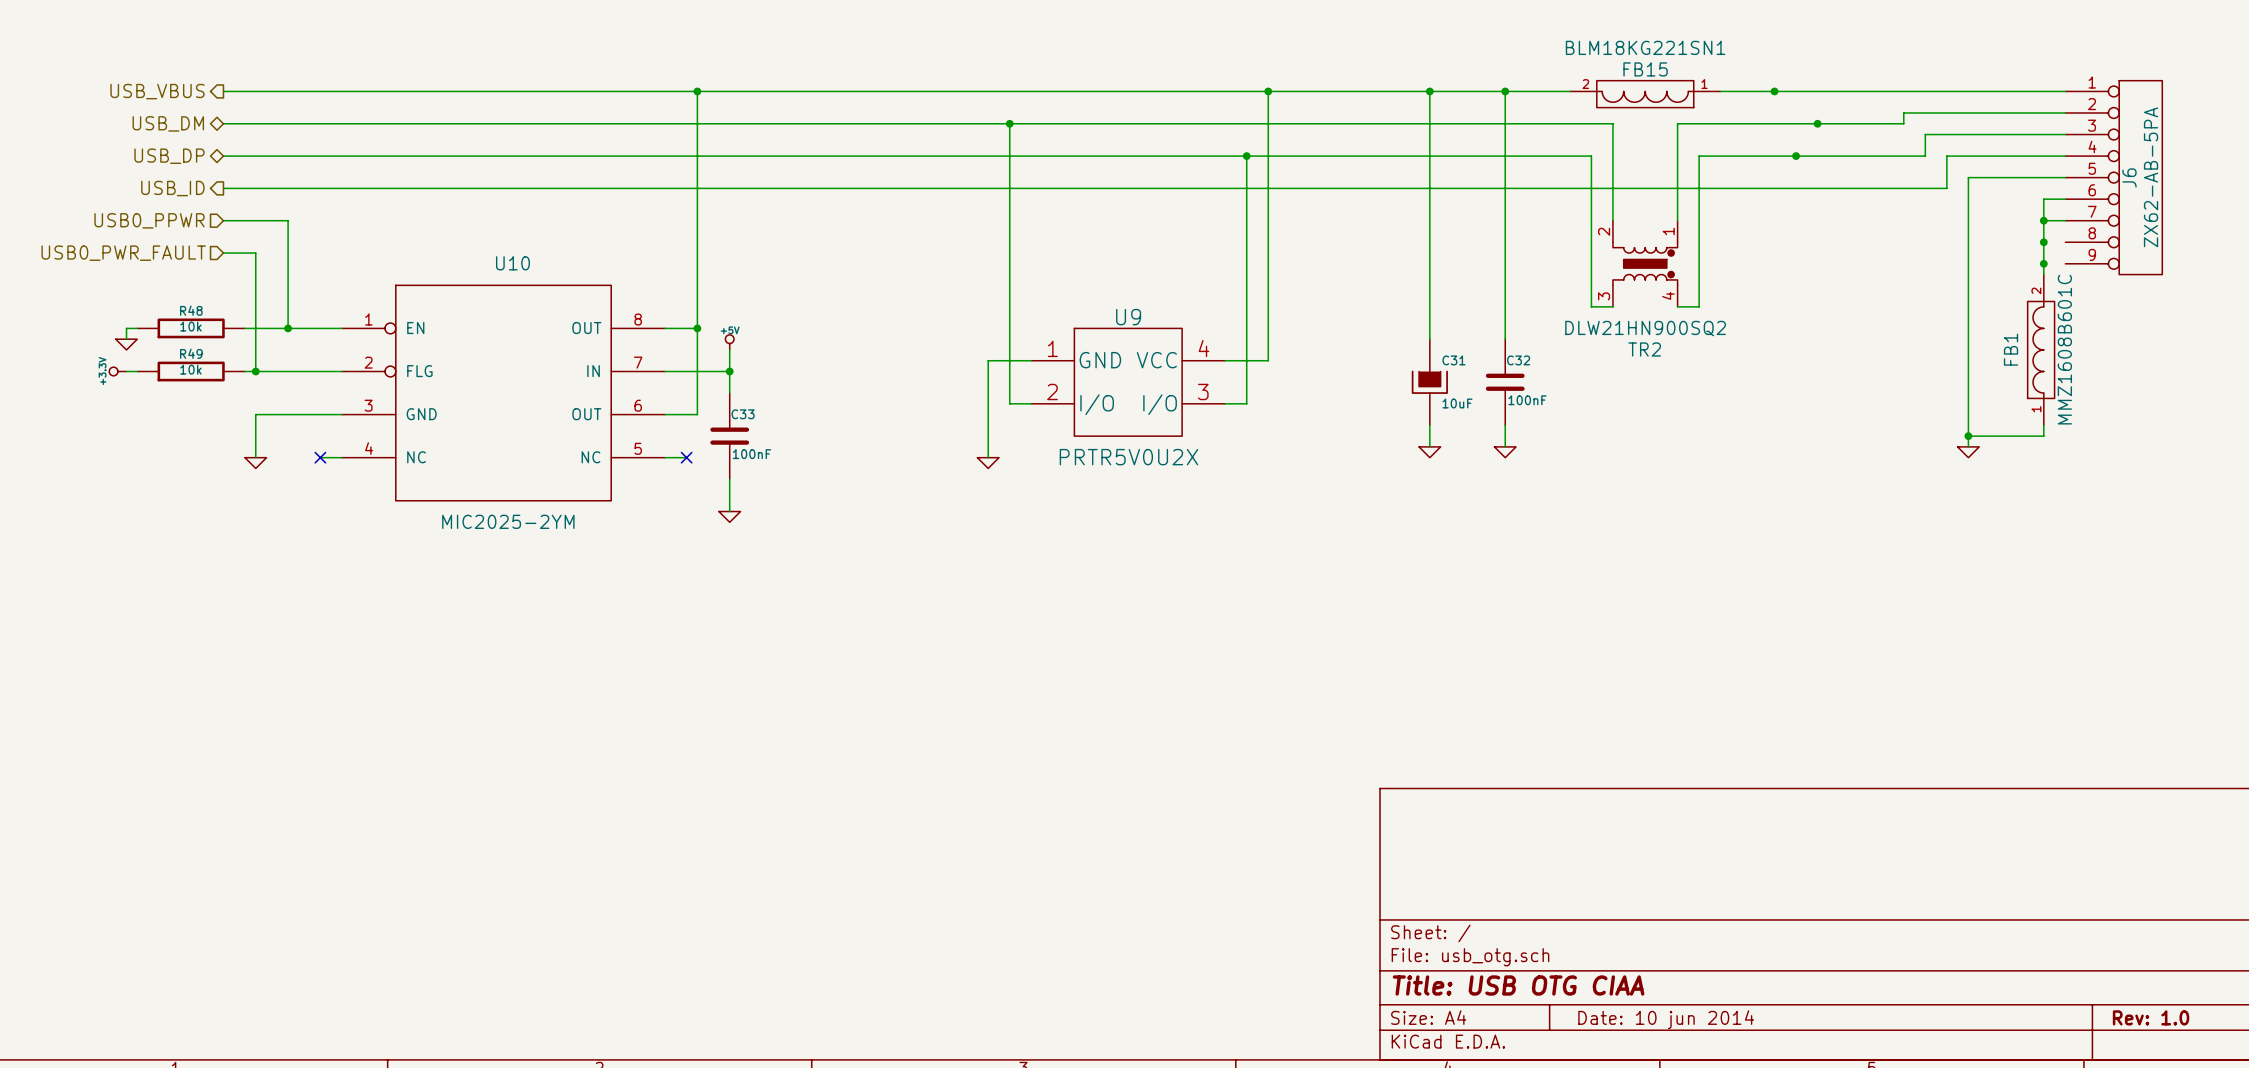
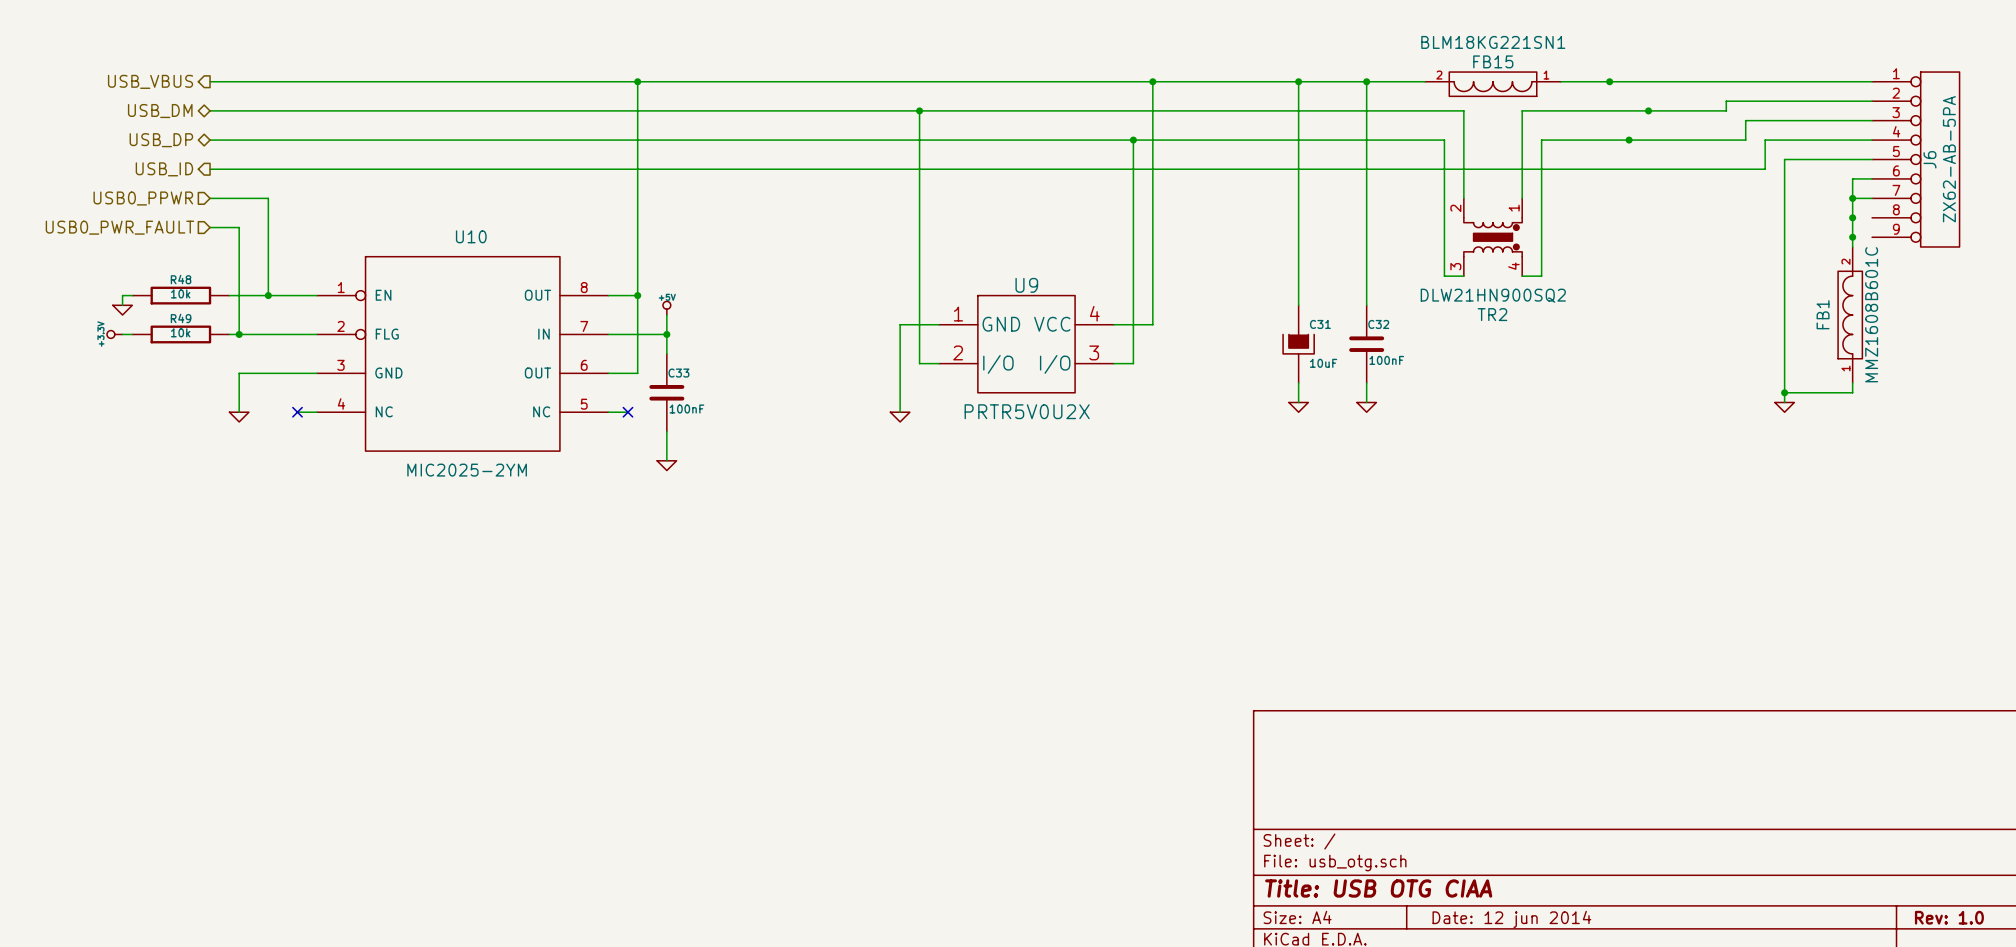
title block: Date: 10 jun 2014 (1666, 1019) -> Date: 12 jun 2014 (1511, 919)

